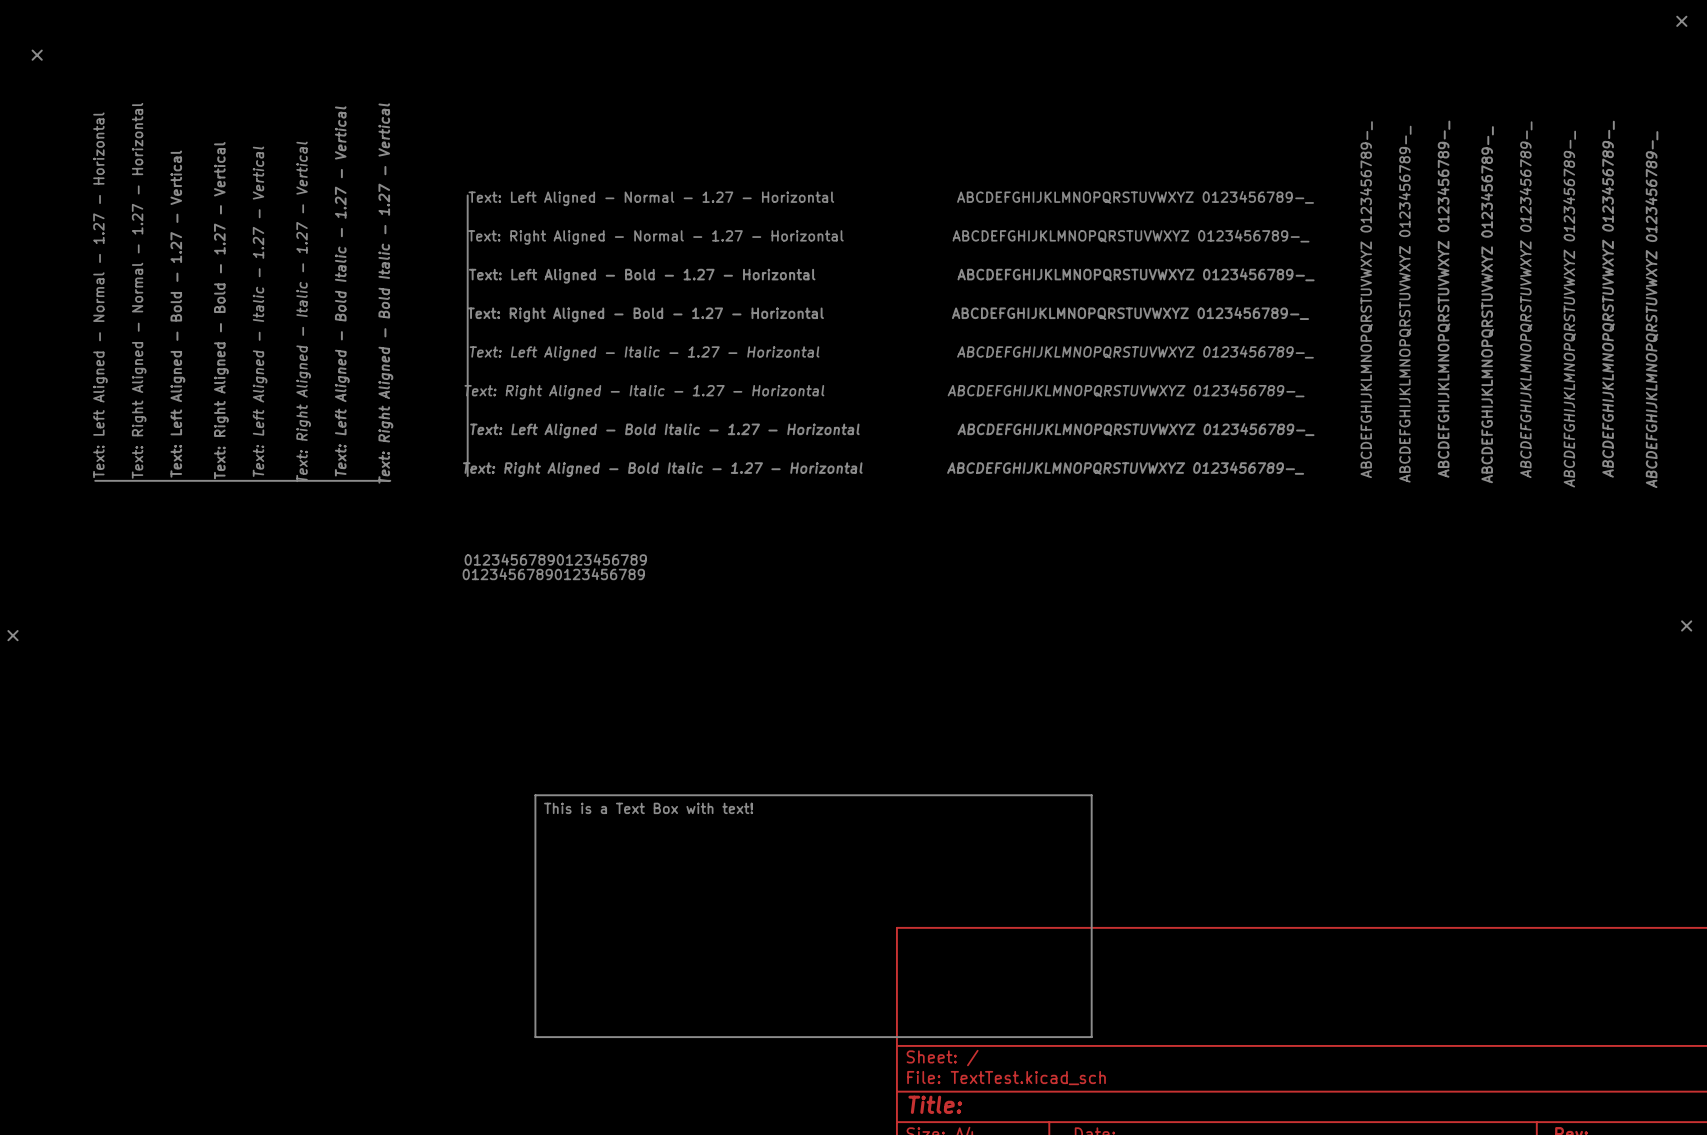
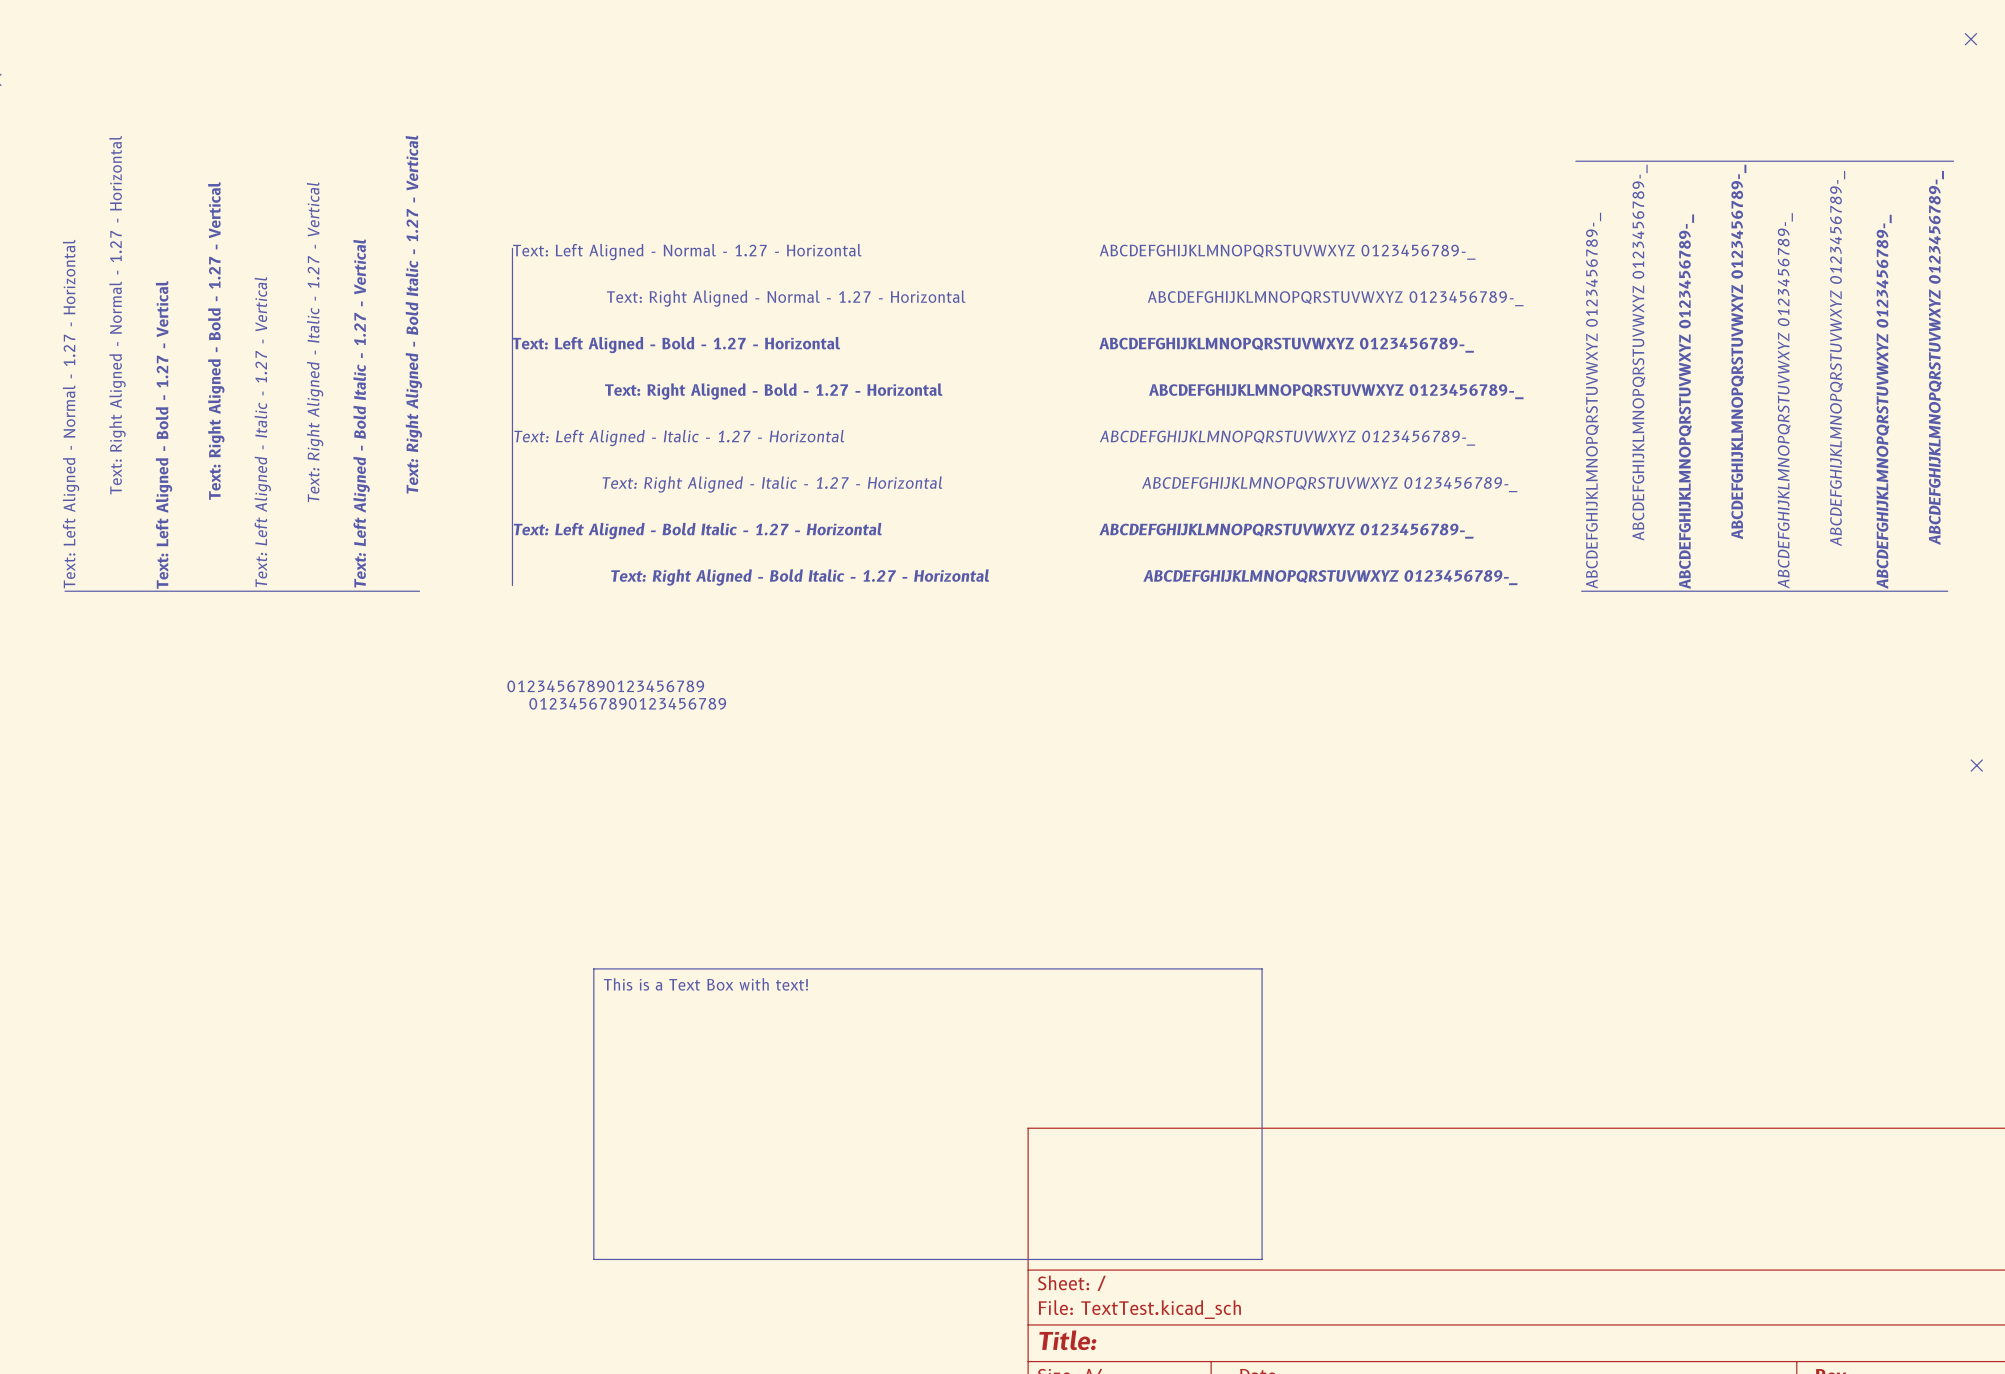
line: none -> (1575, 161) (1953, 161)
line: none -> (1581, 591) (1947, 591)

